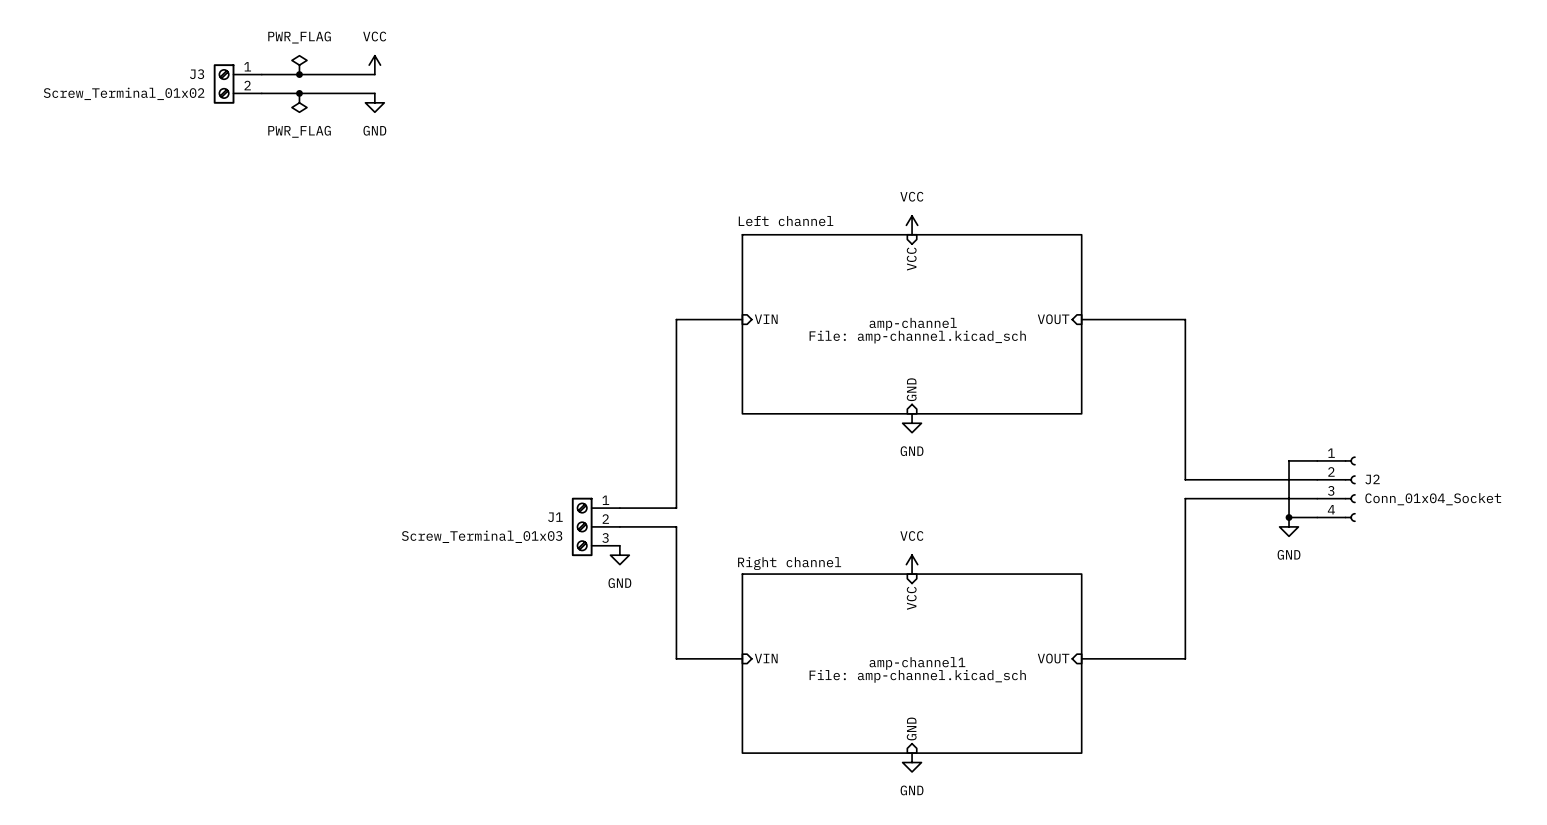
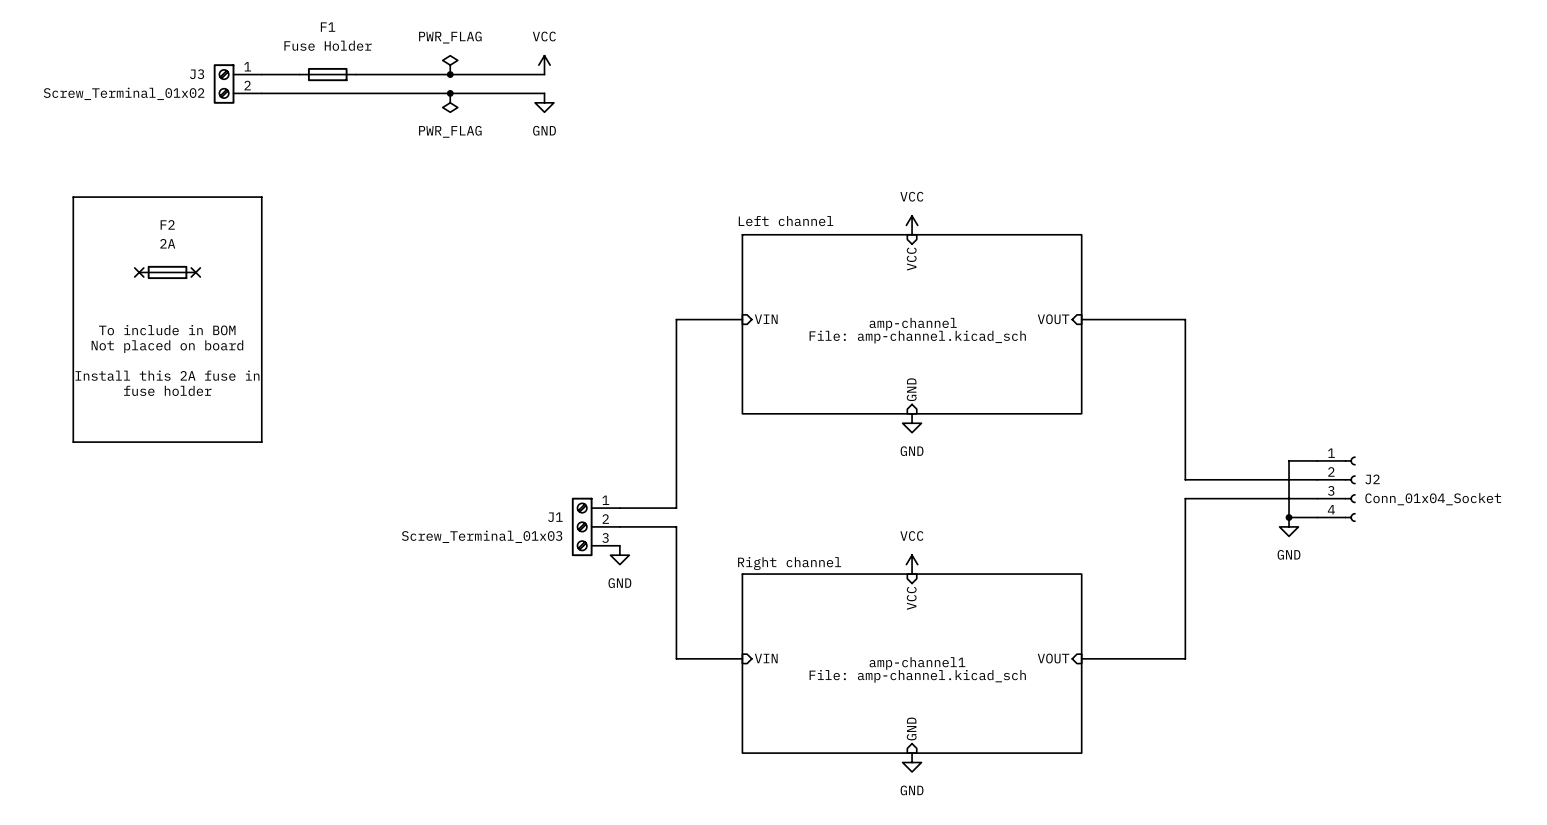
power symbol: PWR_FLAG (299, 65) -> none
power symbol position: VCC (374, 65) -> VCC (544, 65)
power symbol: none -> PWR_FLAG (450, 65)
junction: (299, 74) -> none
F1: none -> Fuse Holder (327, 74)
wire: none -> (374, 74) (544, 74)
junction: none -> (450, 74)
junction: (299, 93) -> none
wire: none -> (374, 93) (544, 93)
junction: none -> (450, 93)
power symbol: PWR_FLAG (299, 102) -> none
power symbol position: GND (374, 102) -> GND (544, 102)
power symbol: none -> PWR_FLAG (450, 102)
line: none -> (73, 197) (261, 197) (261, 442) (73, 442) (73, 197)
no-connect mark: none -> (139, 272)
F2: none -> 2A (167, 272)
no-connect mark: none -> (195, 272)
text: none -> To include in BOM (167, 330)
text: none -> Not placed on board (167, 346)
text: none -> Install this 2A fuse in (167, 375)
text: none -> fuse holder (167, 390)

